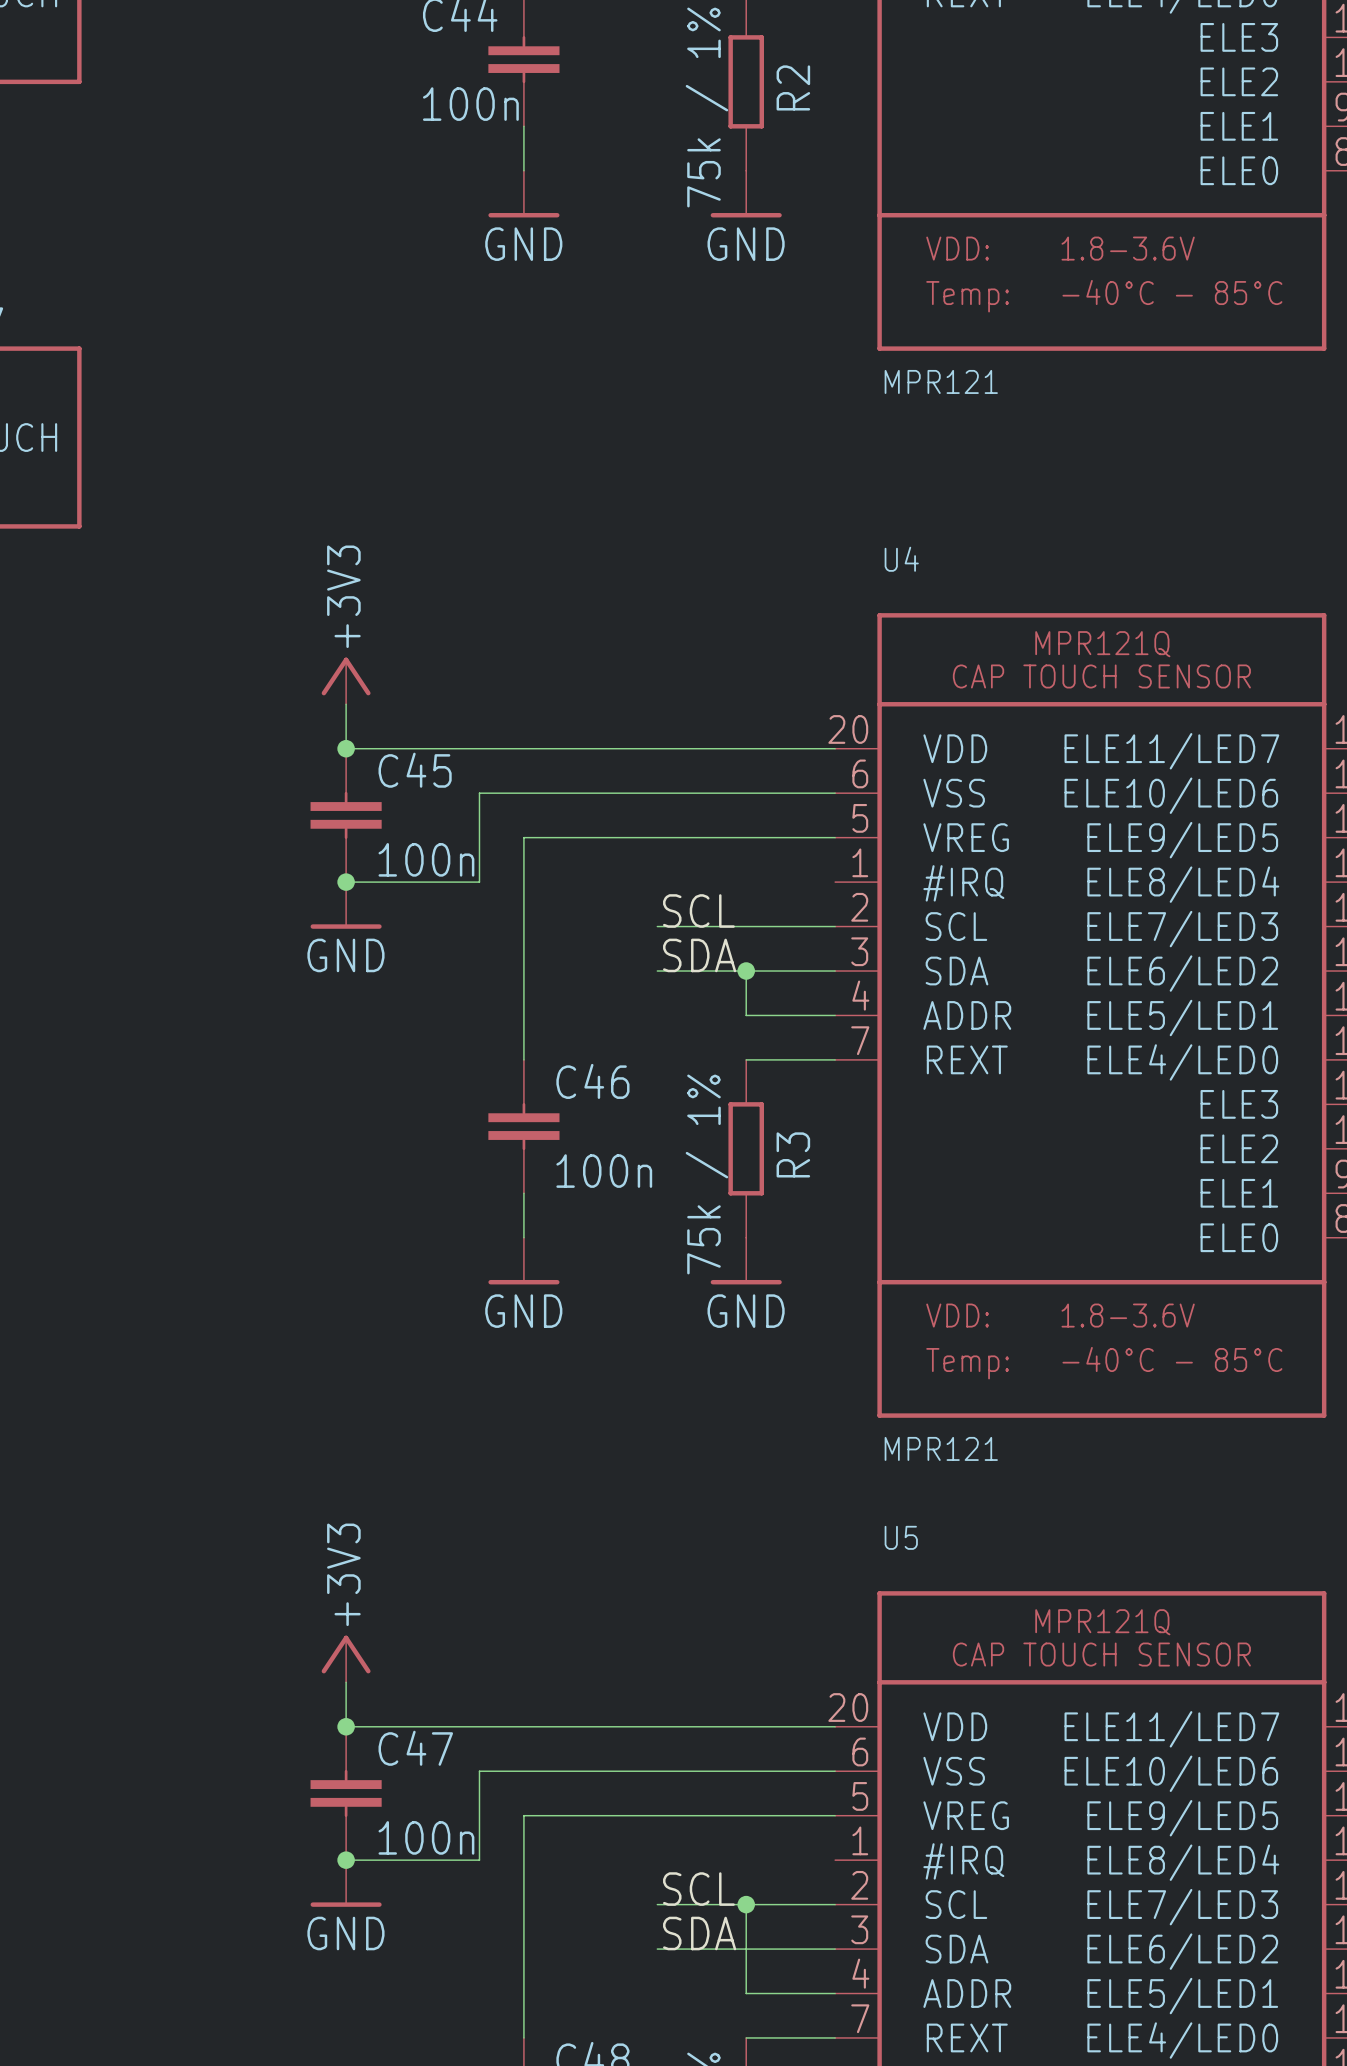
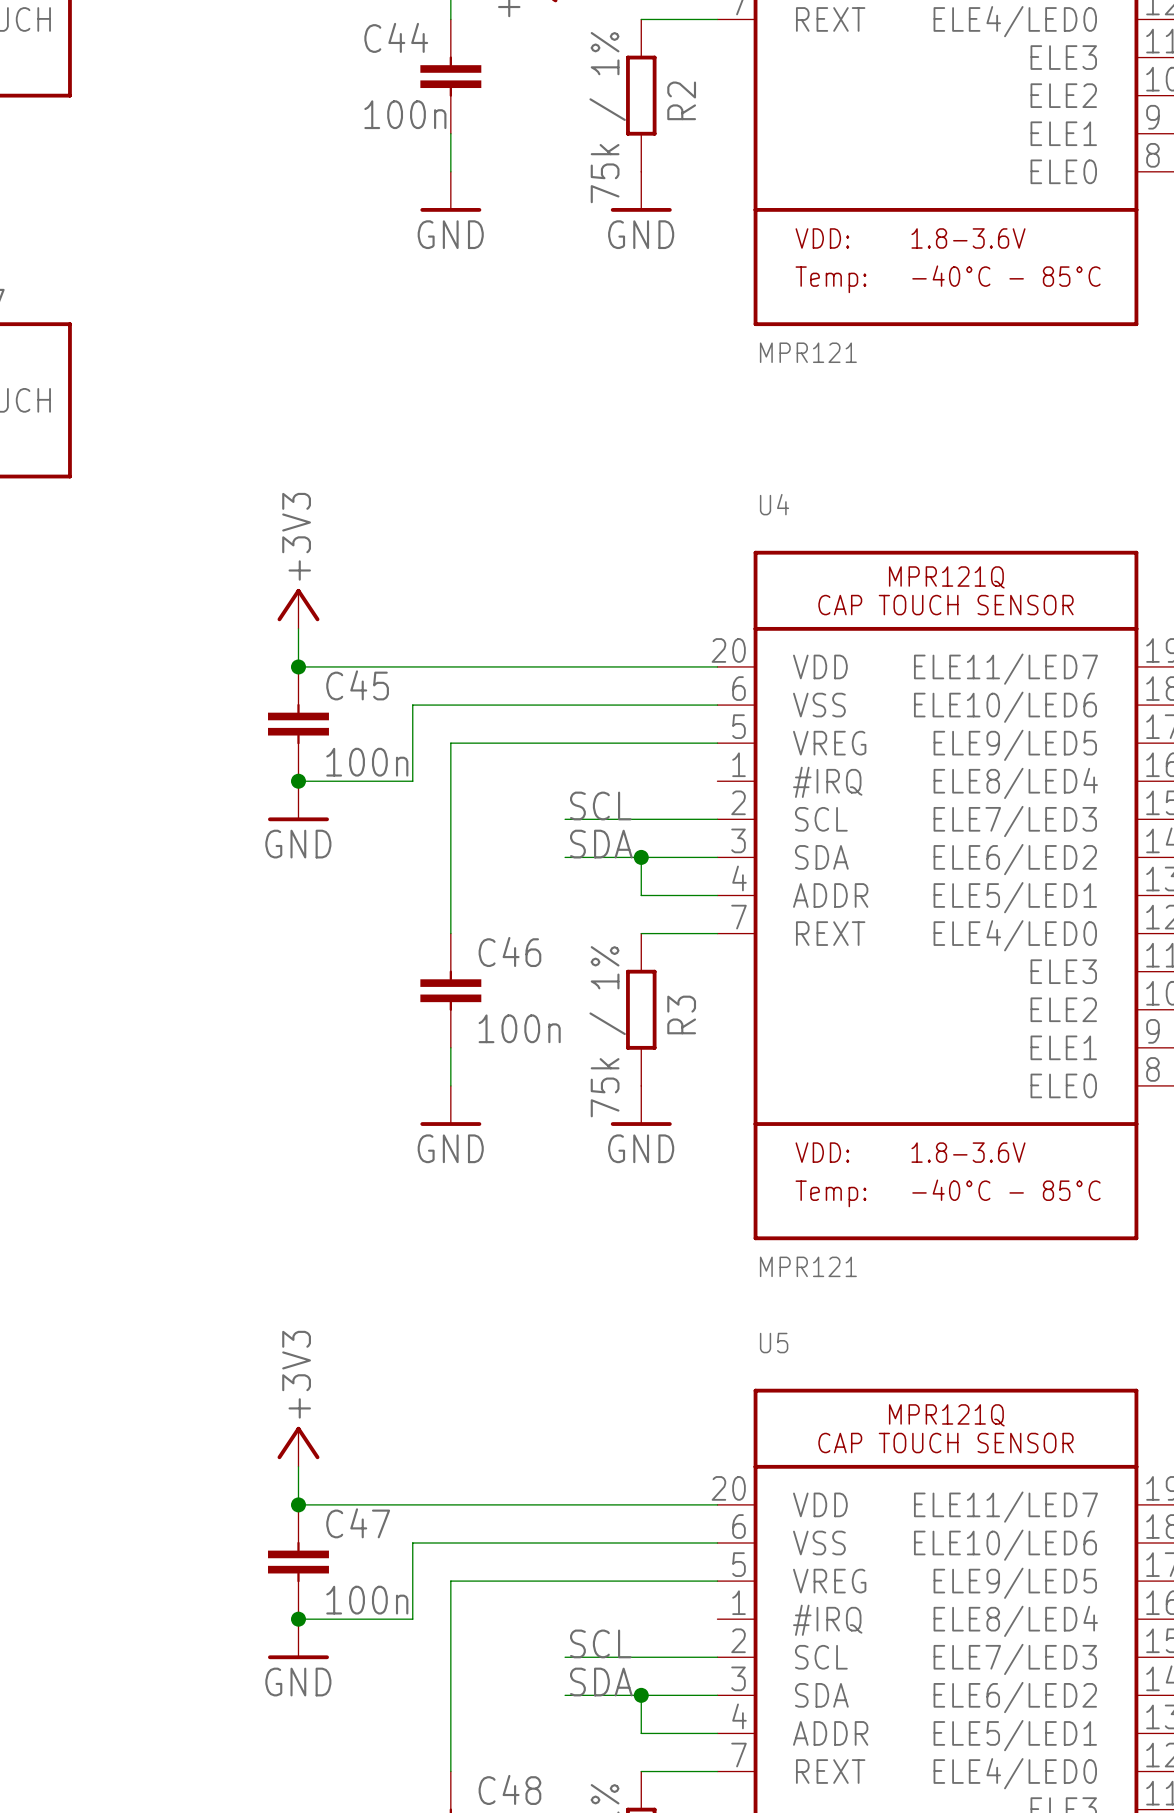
wire: (746, 1904) (746, 1949) -> none
junction position: (746, 1904) -> (641, 1695)

